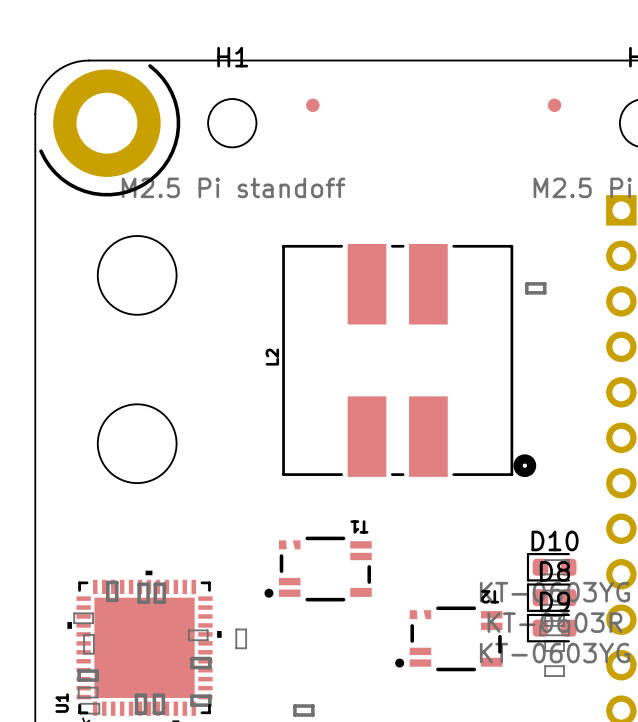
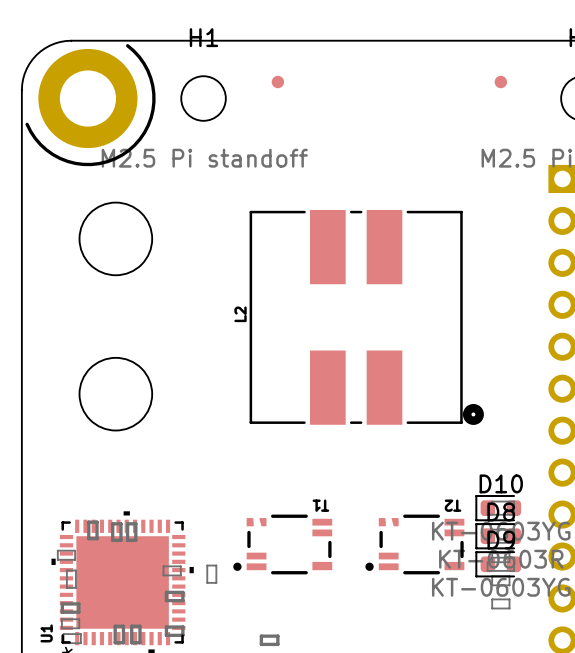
part: (535, 288) -> none
T1 position: (318, 569) -> (282, 544)
part: none -> (116, 532)
part: (143, 593) -> none
part: none -> (131, 532)
part: (159, 593) -> none
T2 position: (448, 638) -> (414, 544)

